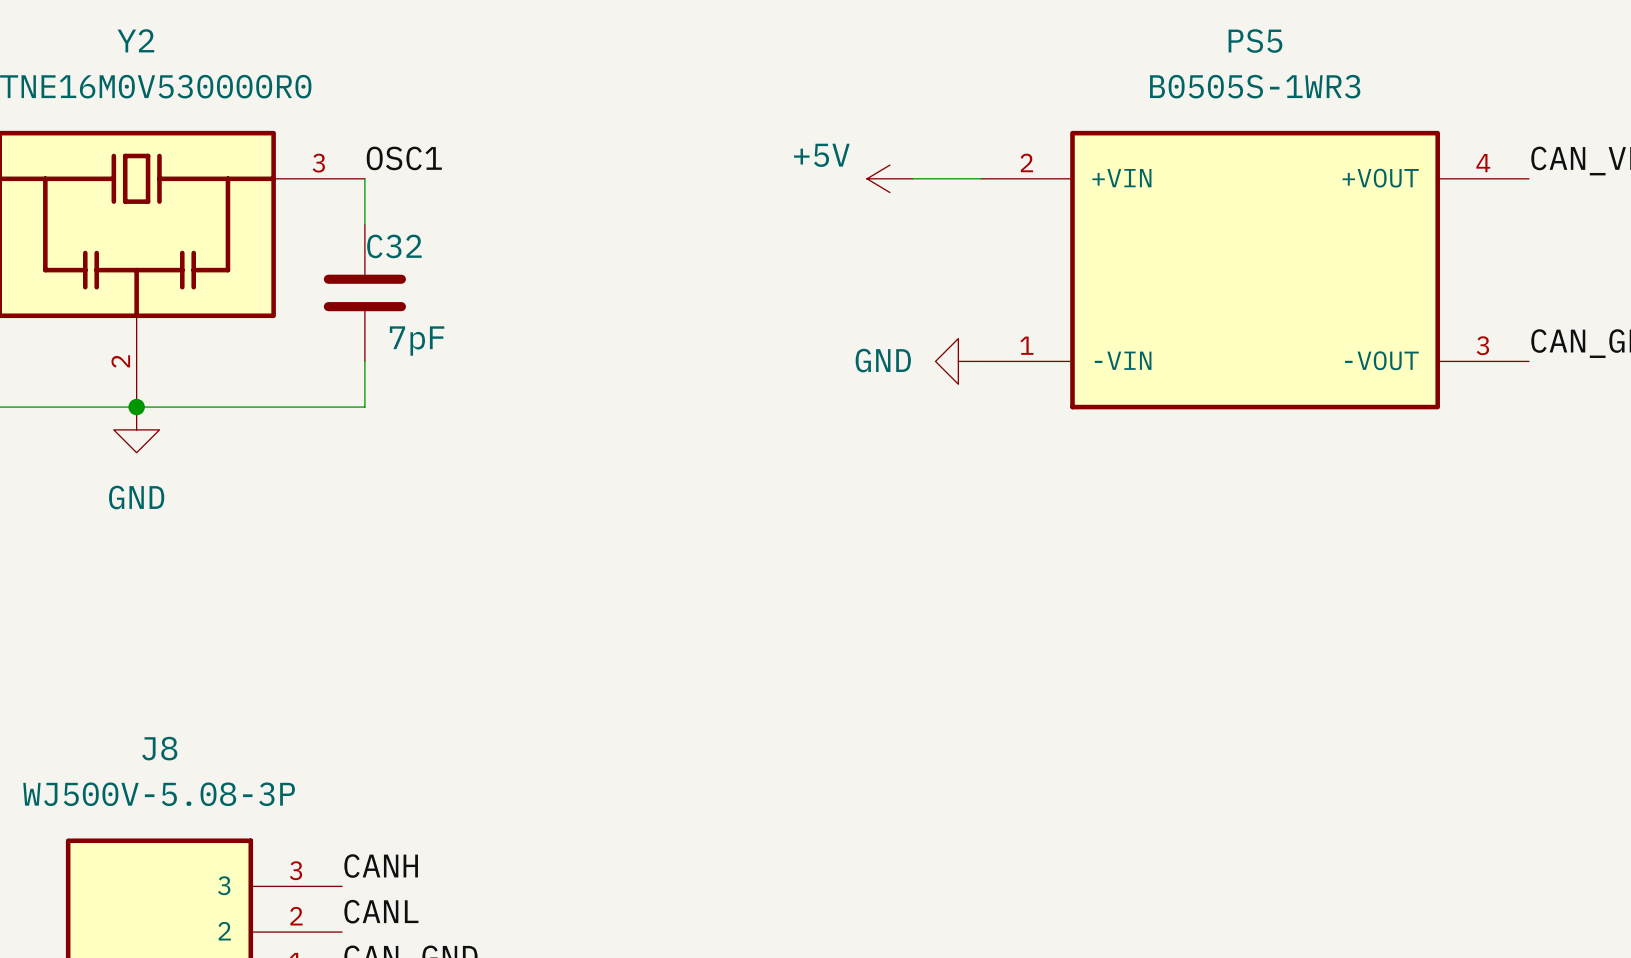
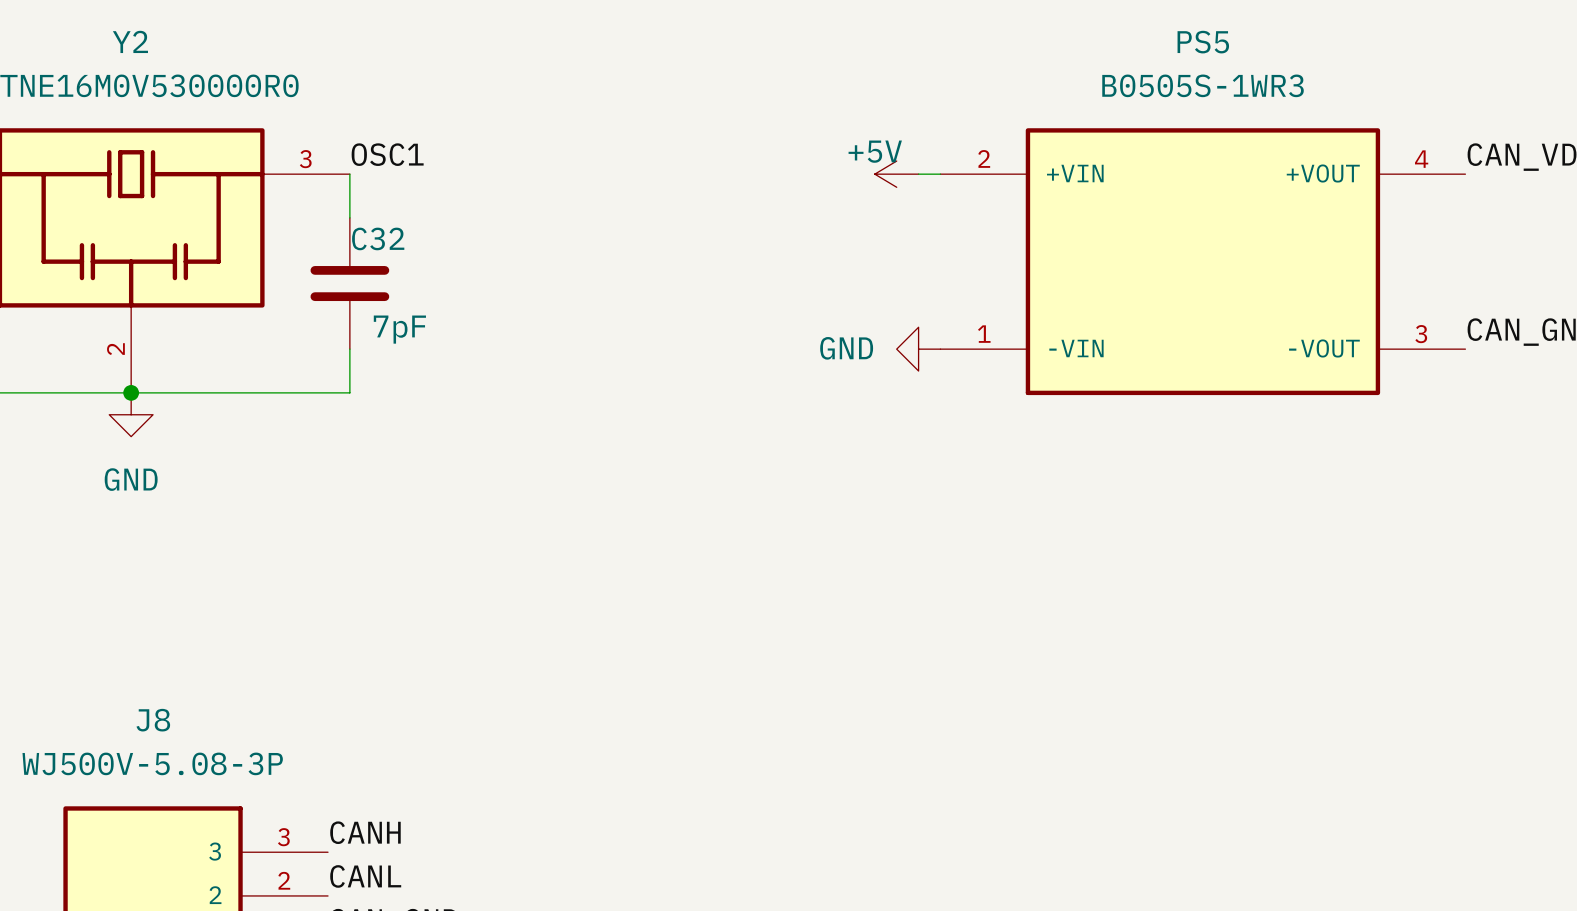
power symbol text position: +5V (821, 155) -> +5V (875, 151)
power symbol position: +5V (889, 178) -> +5V (896, 174)

